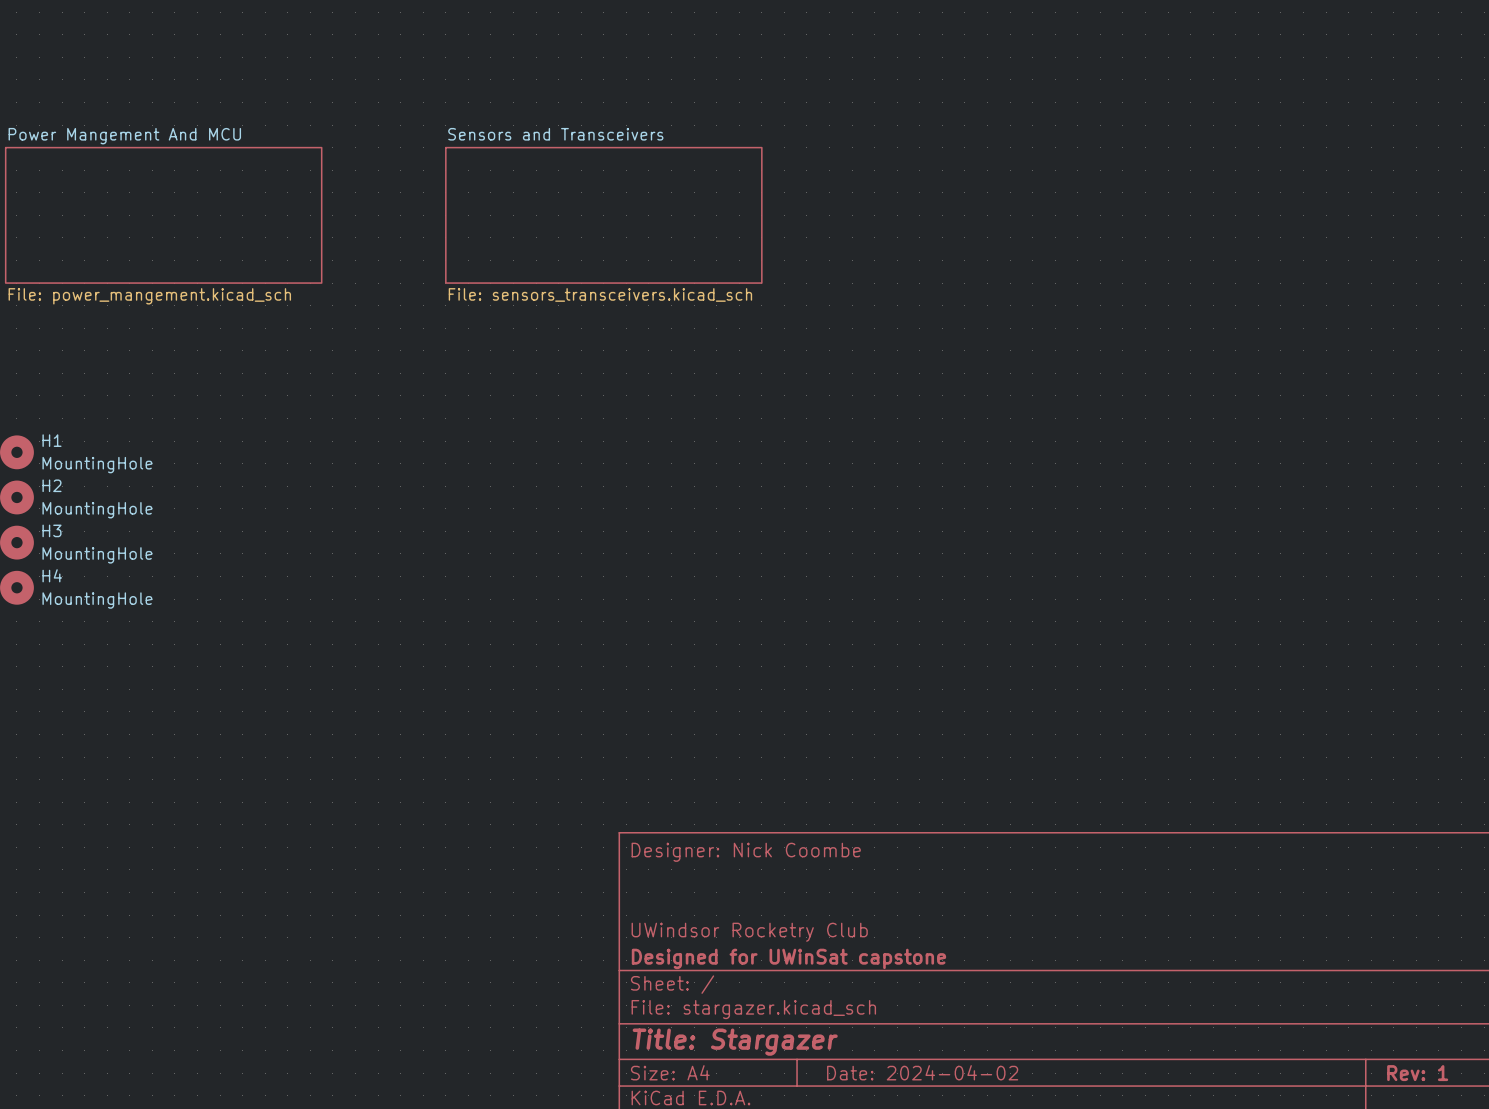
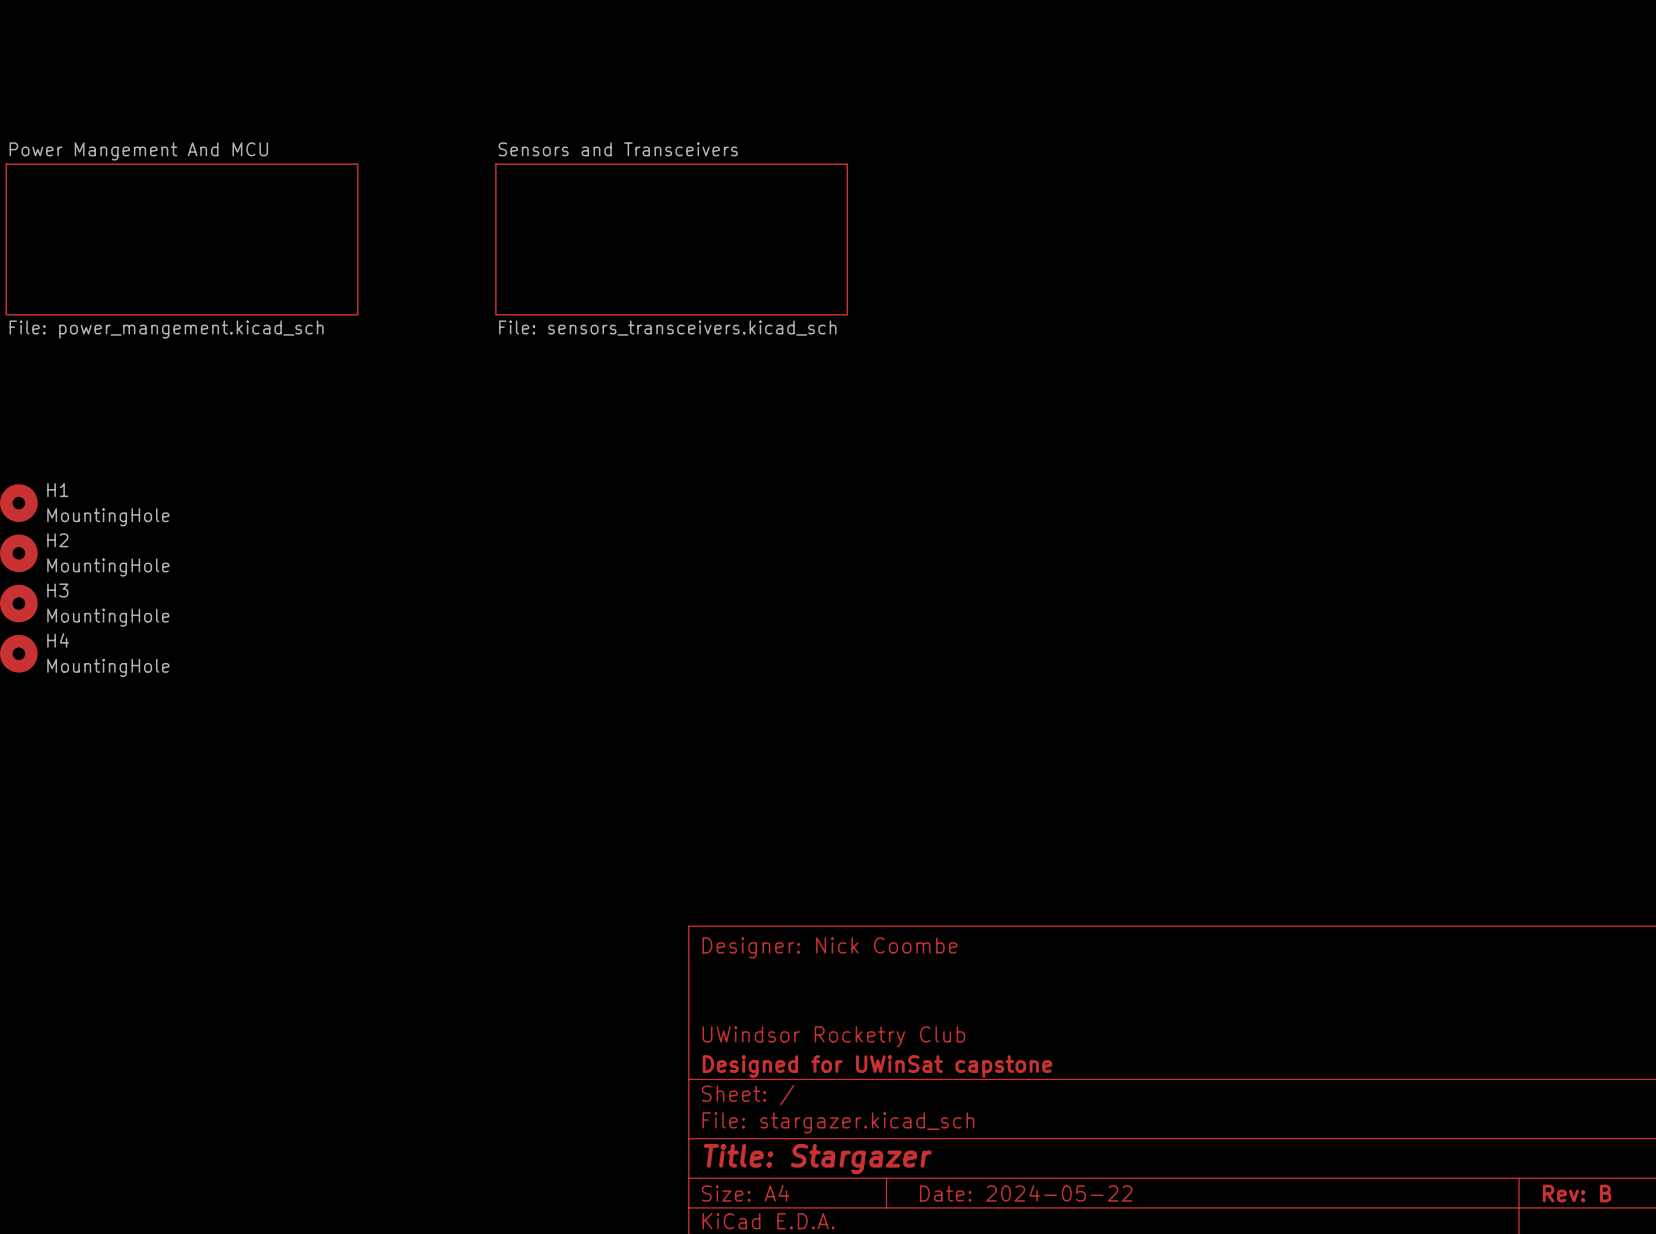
title block: Date: 2024-04-02 (922, 1072) -> Date: 2024-05-22 (1026, 1193)
title block: Rev: 1 (1417, 1073) -> Rev: B (1577, 1193)

